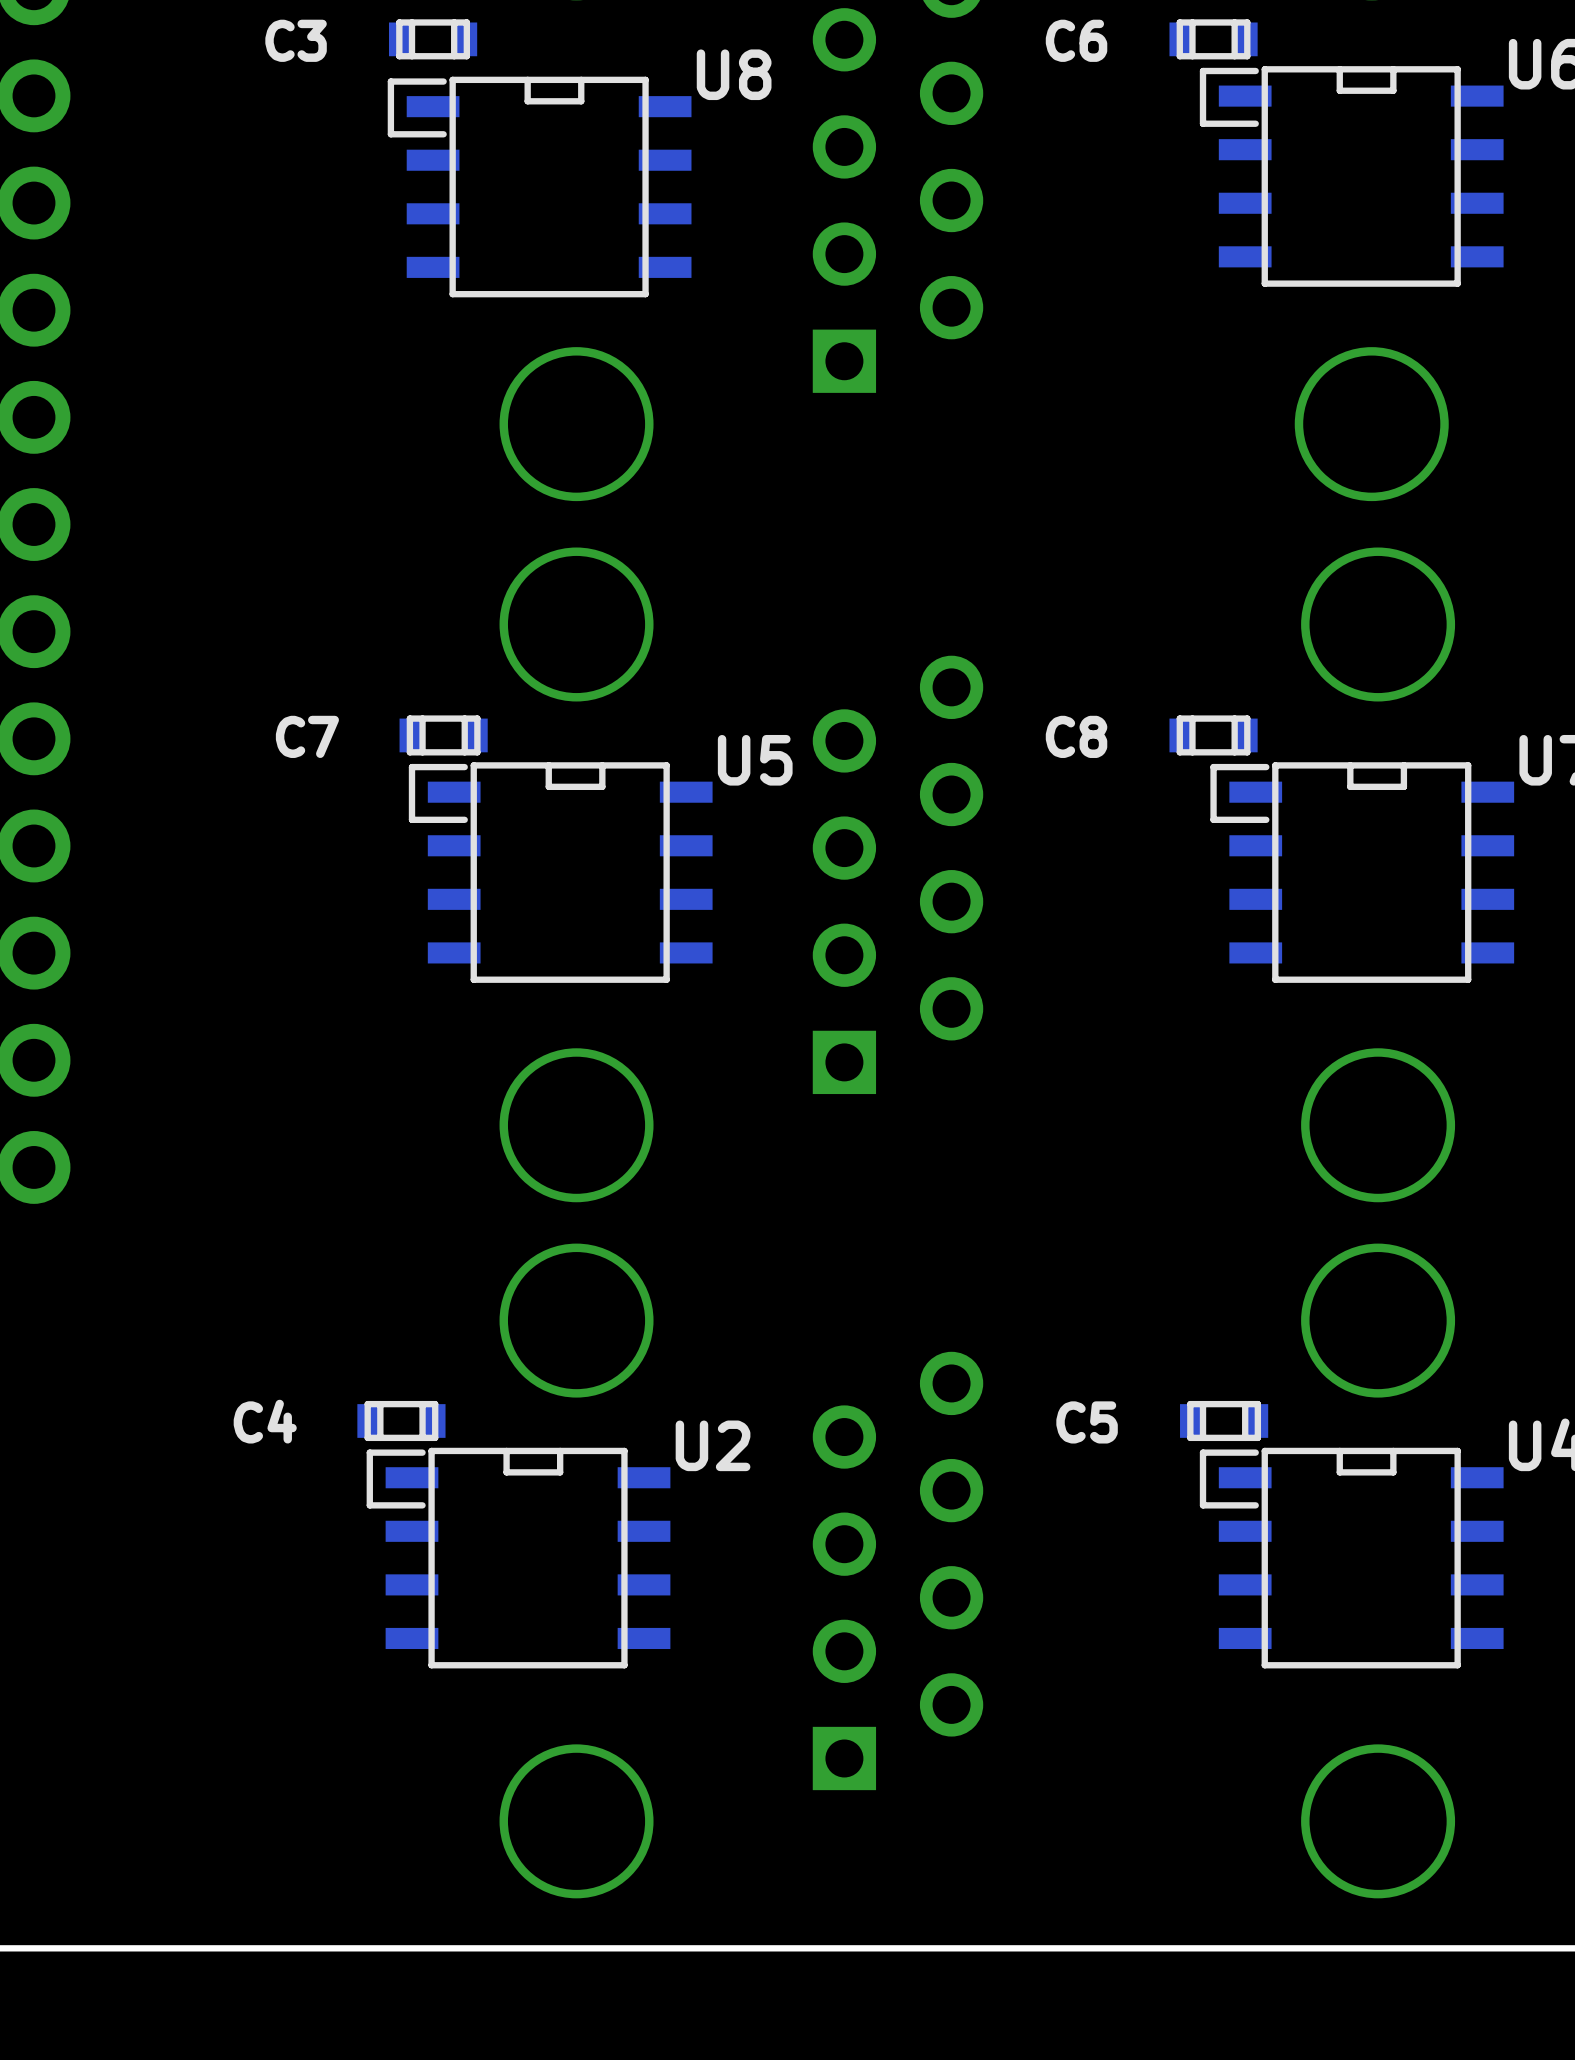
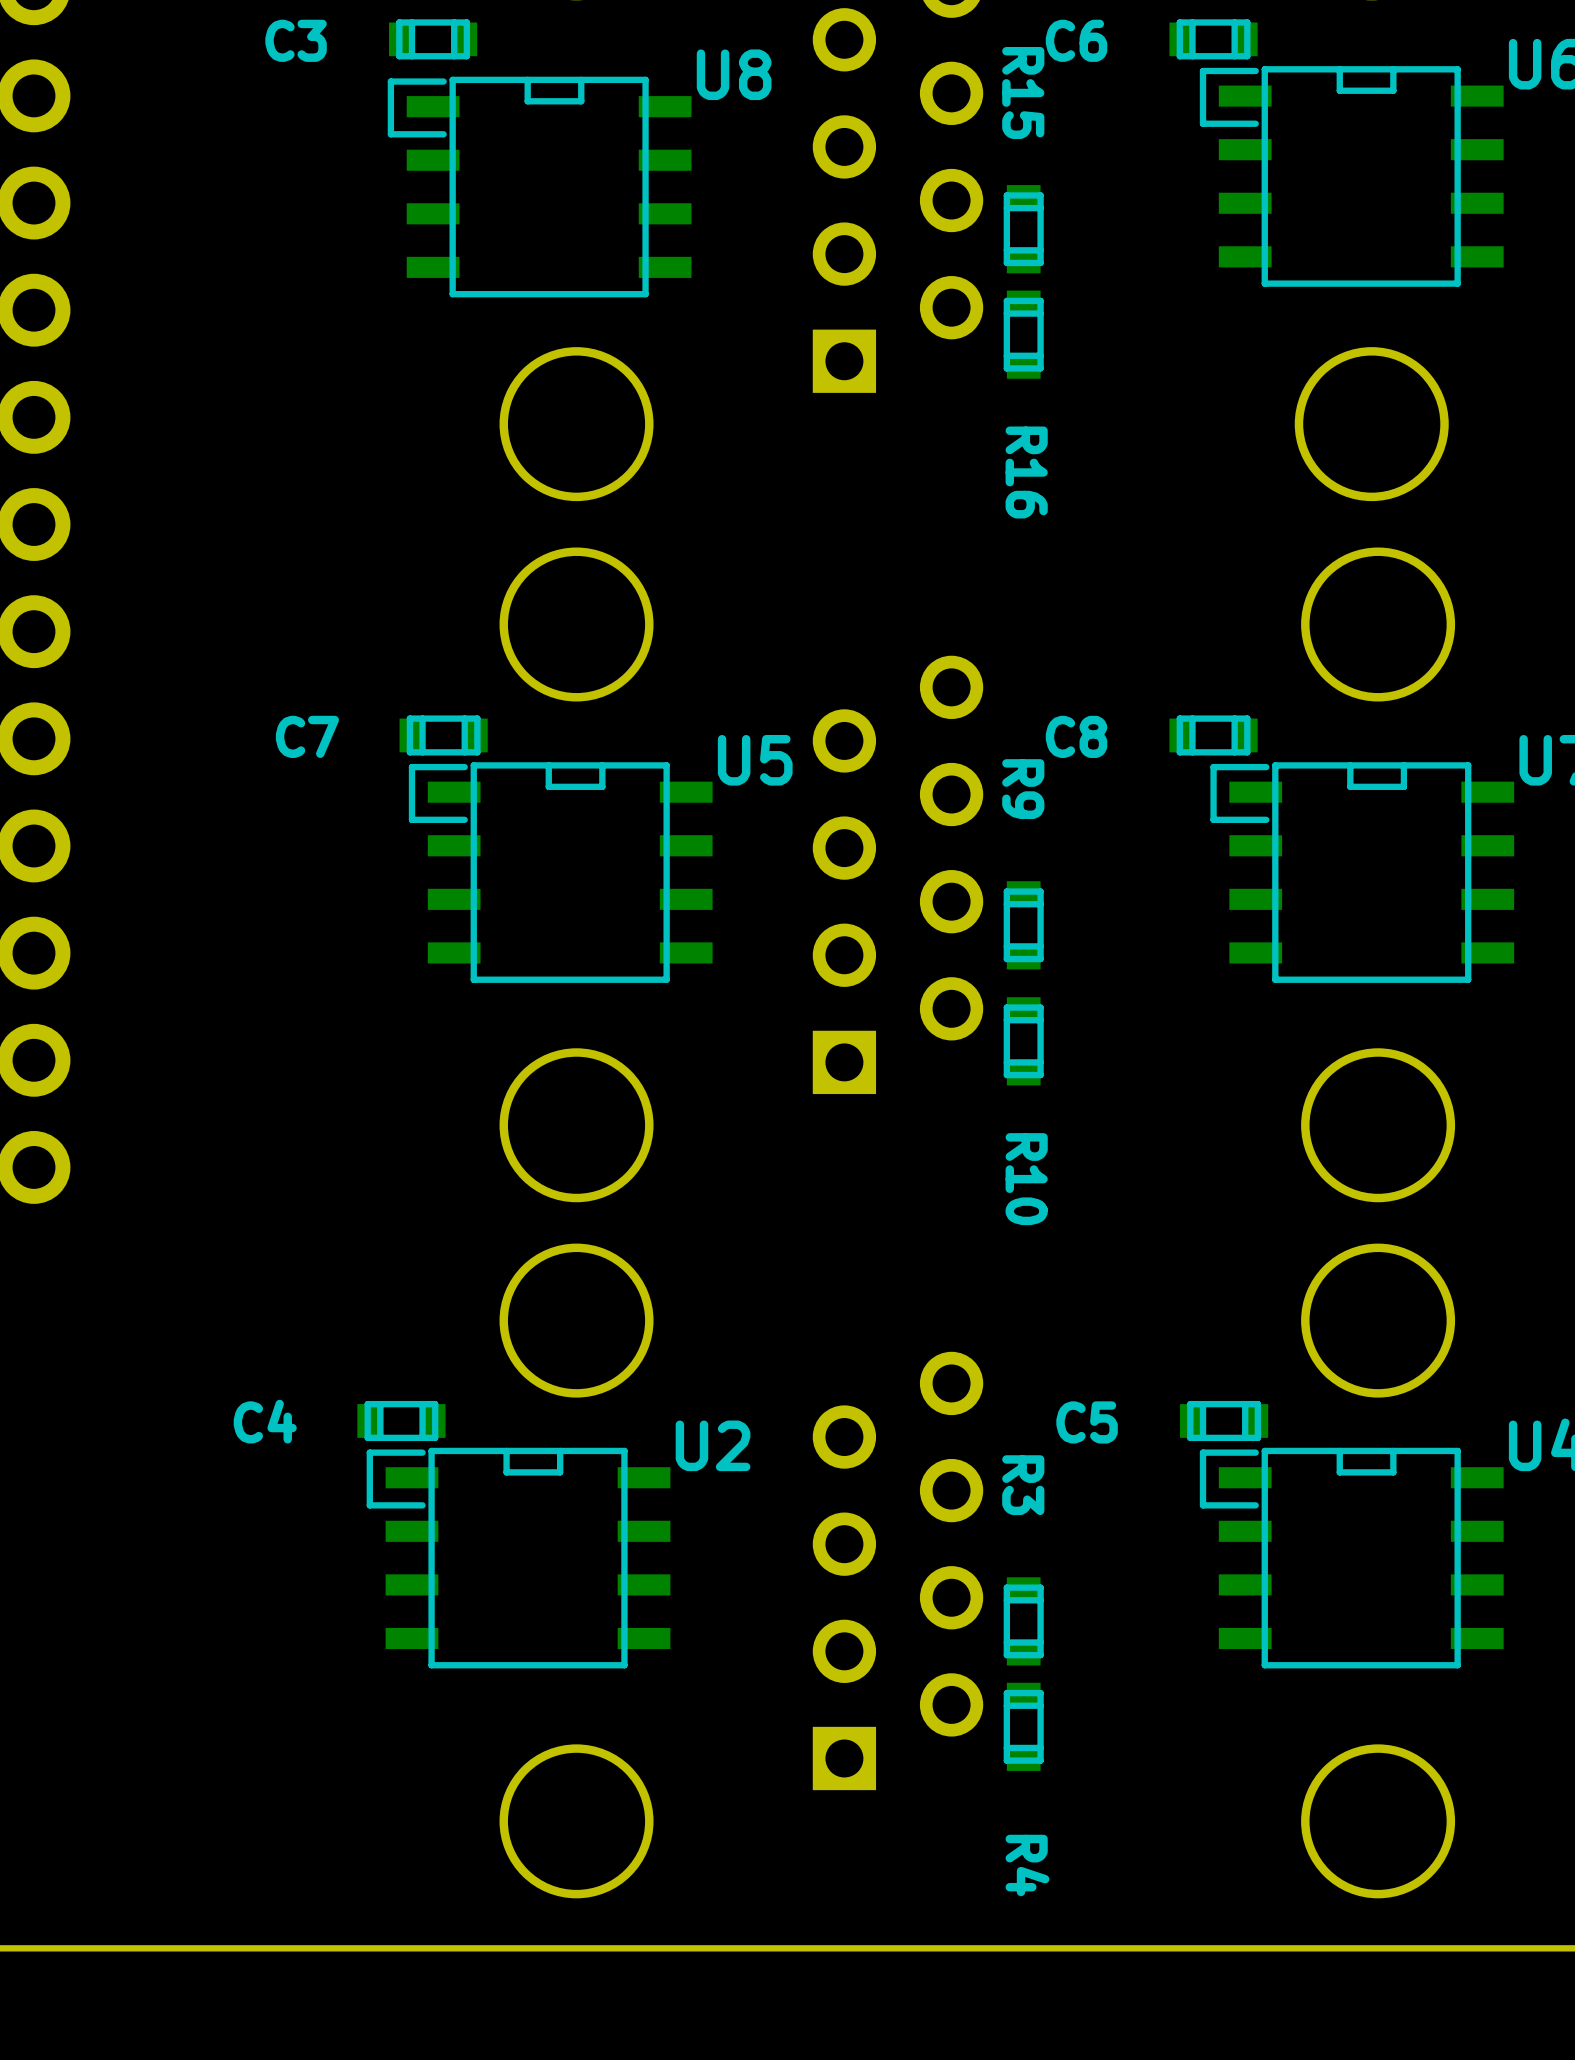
R15: none -> (1023, 229)
R16: none -> (1023, 334)
R9: none -> (1023, 925)
R10: none -> (1023, 1041)
R3: none -> (1023, 1621)
R4: none -> (1023, 1726)

